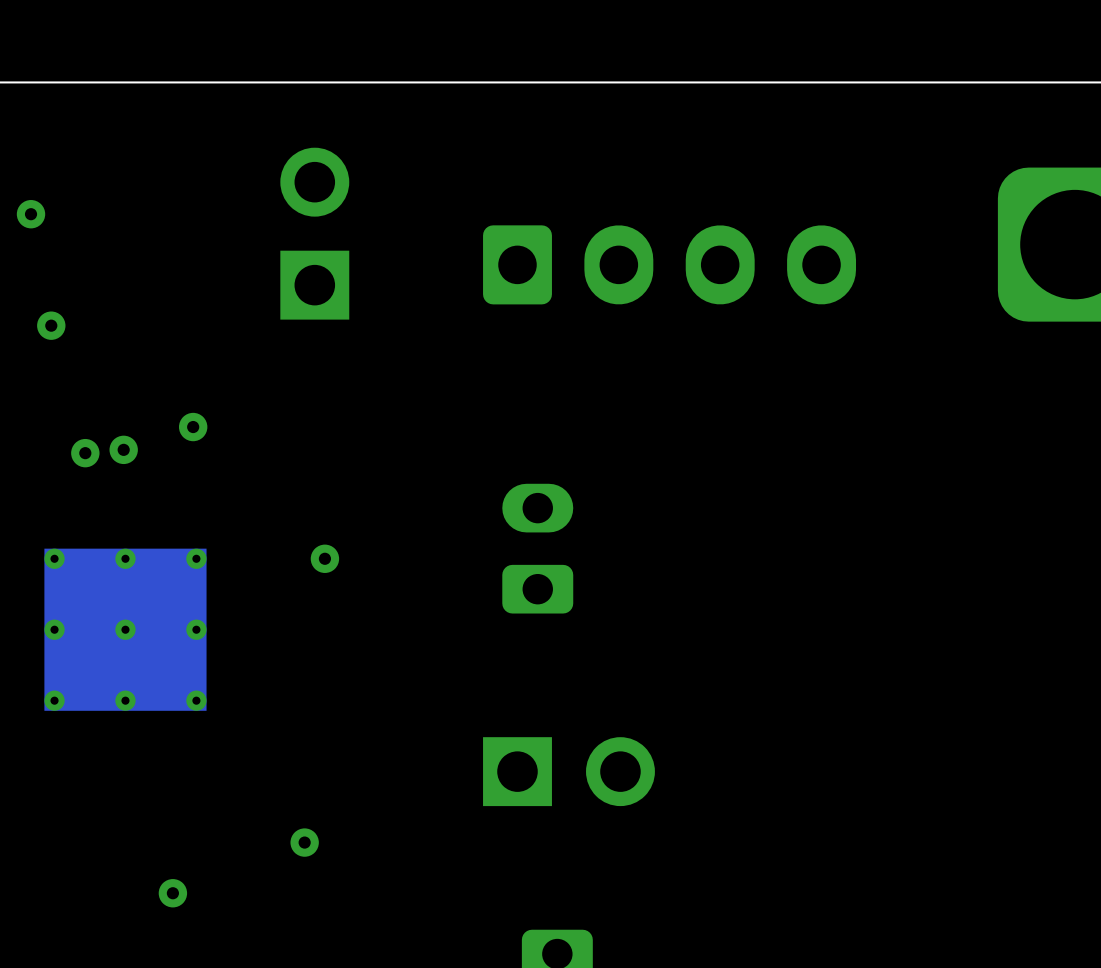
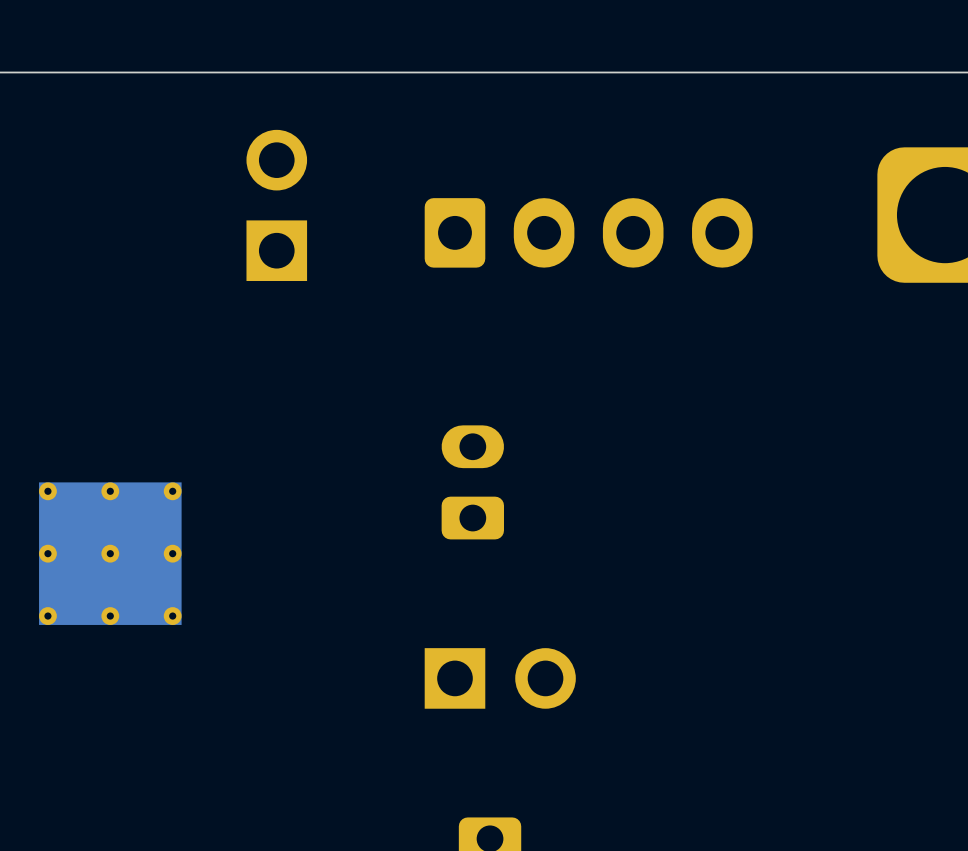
via: (31, 214) -> none
via: (51, 325) -> none
via: (193, 427) -> none
via: (123, 449) -> none
via: (85, 453) -> none
via: (324, 558) -> none
via: (304, 842) -> none
via: (172, 893) -> none

